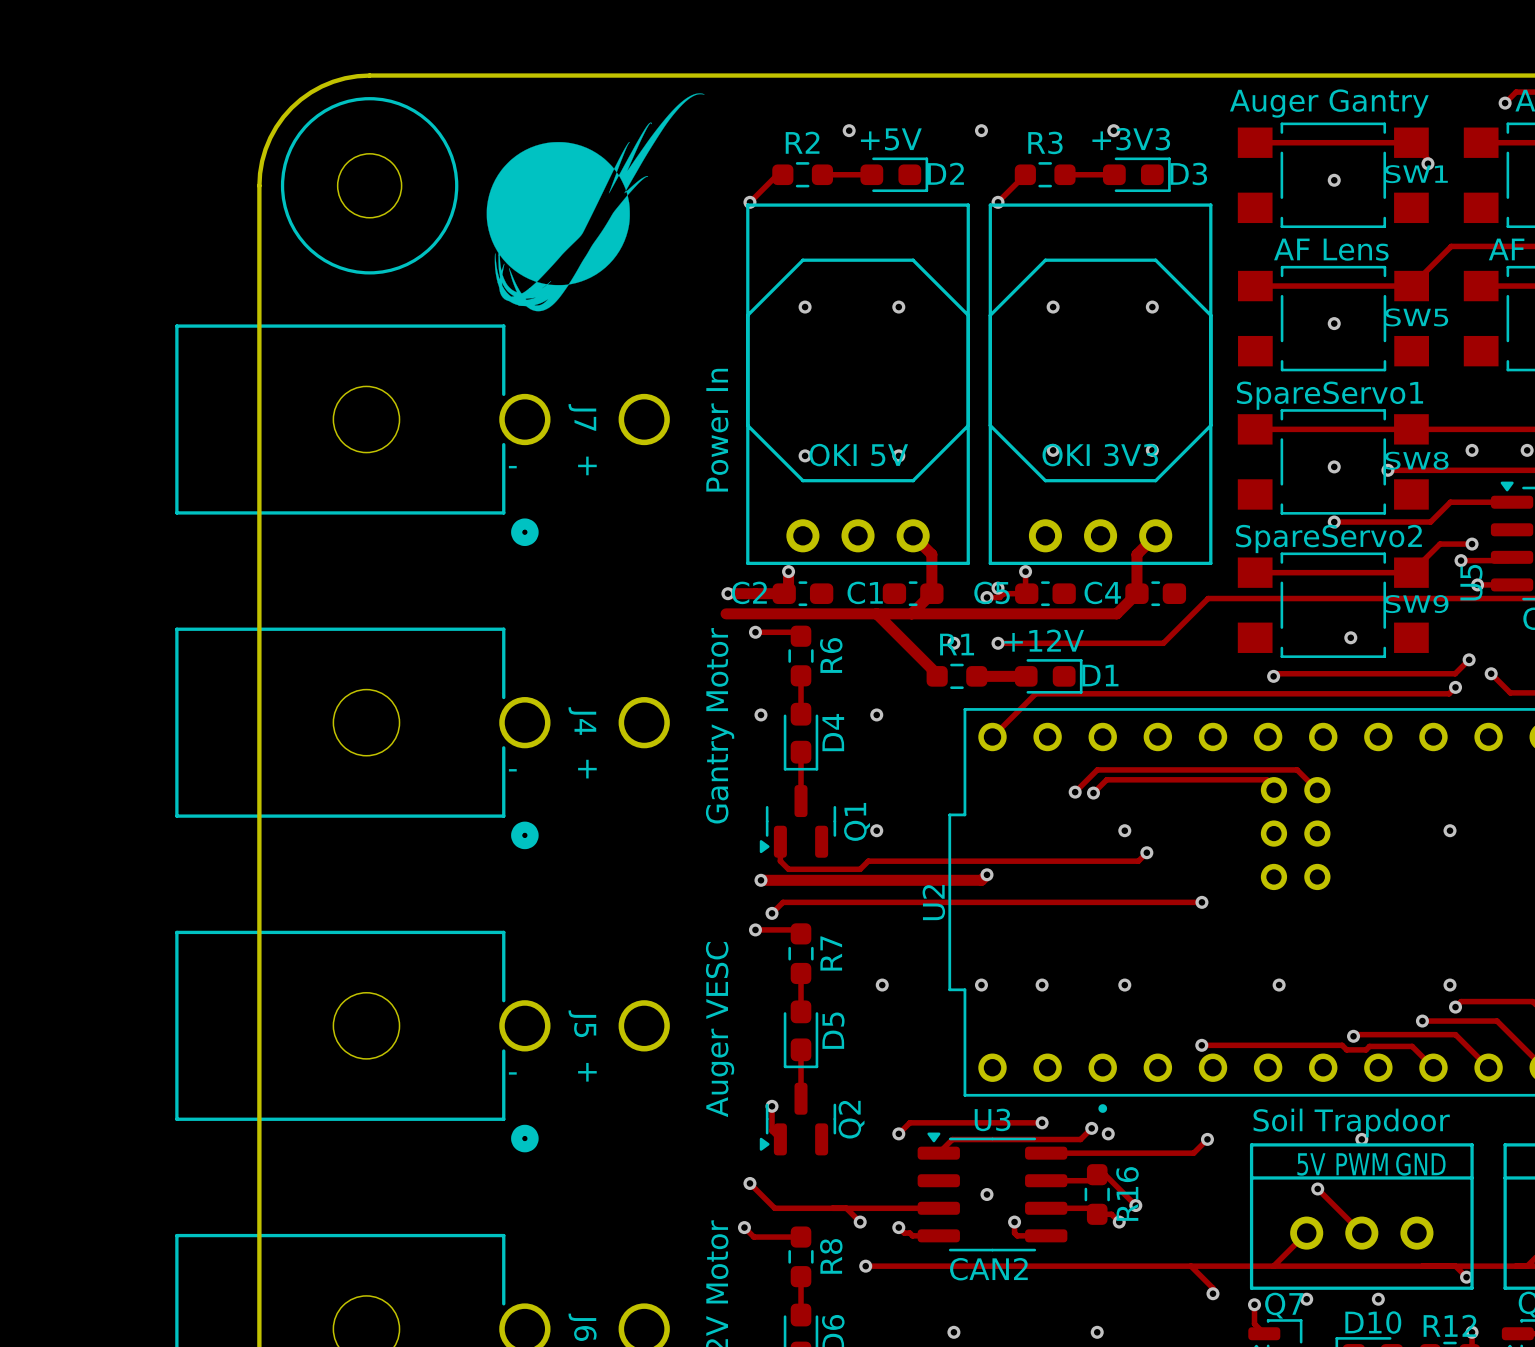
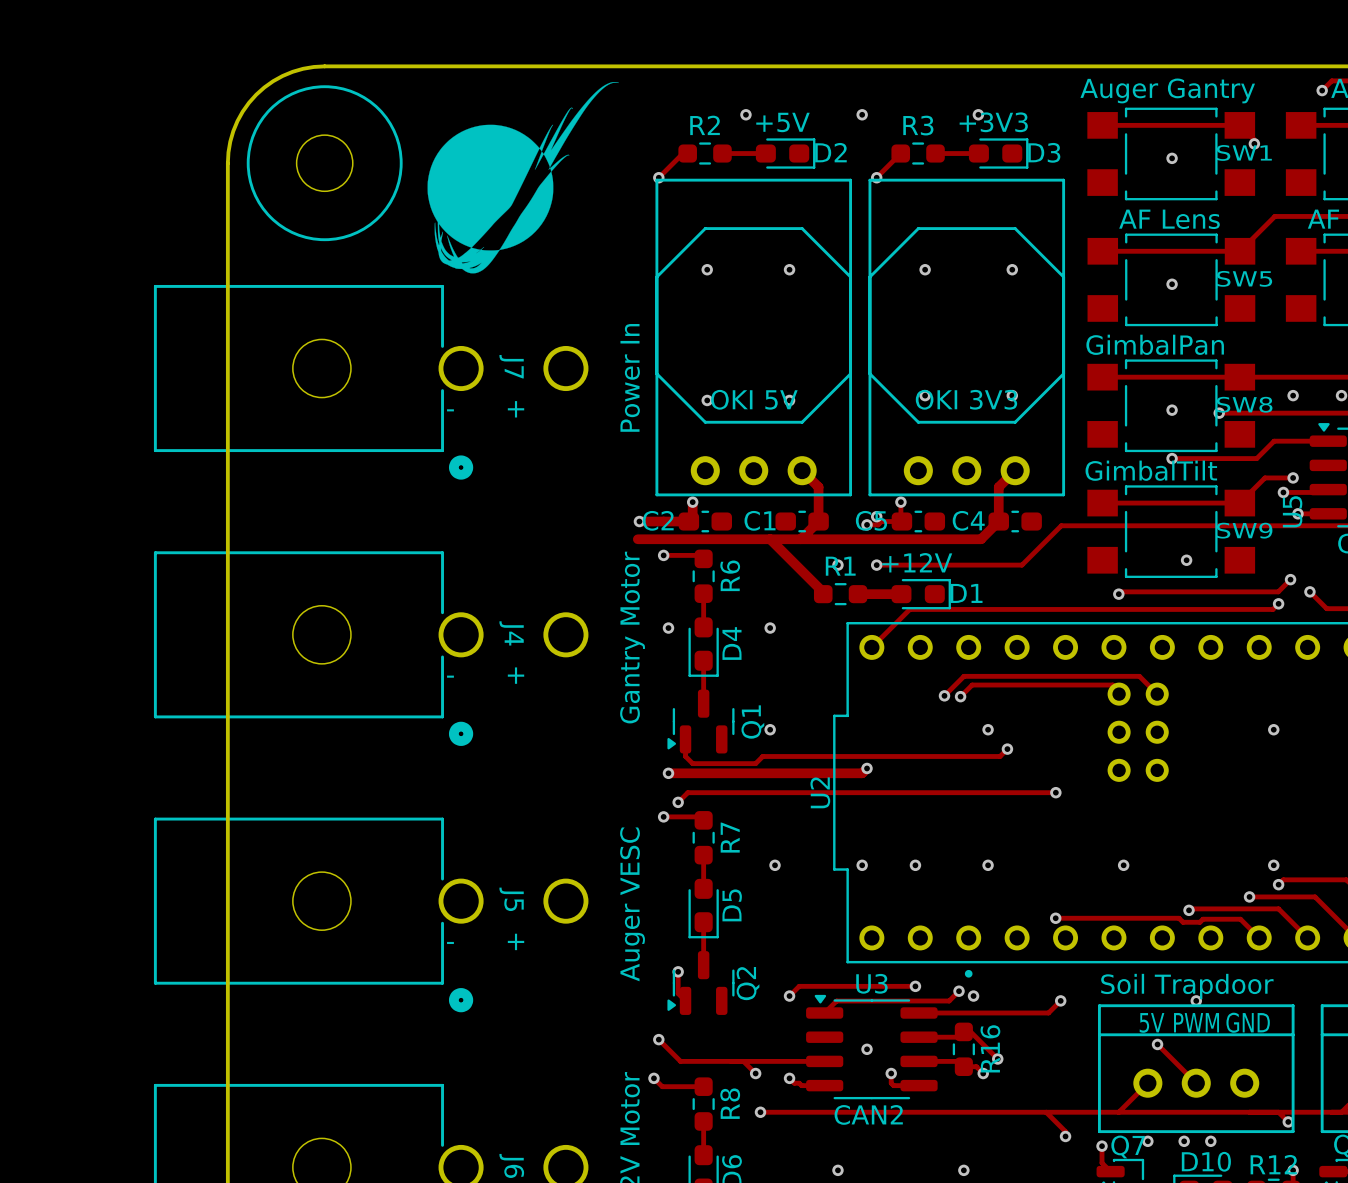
text: SpareServo1 (1330, 395) -> GimbalPan (1155, 344)
text: SpareServo2 (1328, 538) -> GimbalTilt (1151, 470)
via: none -> (1184, 1141)

